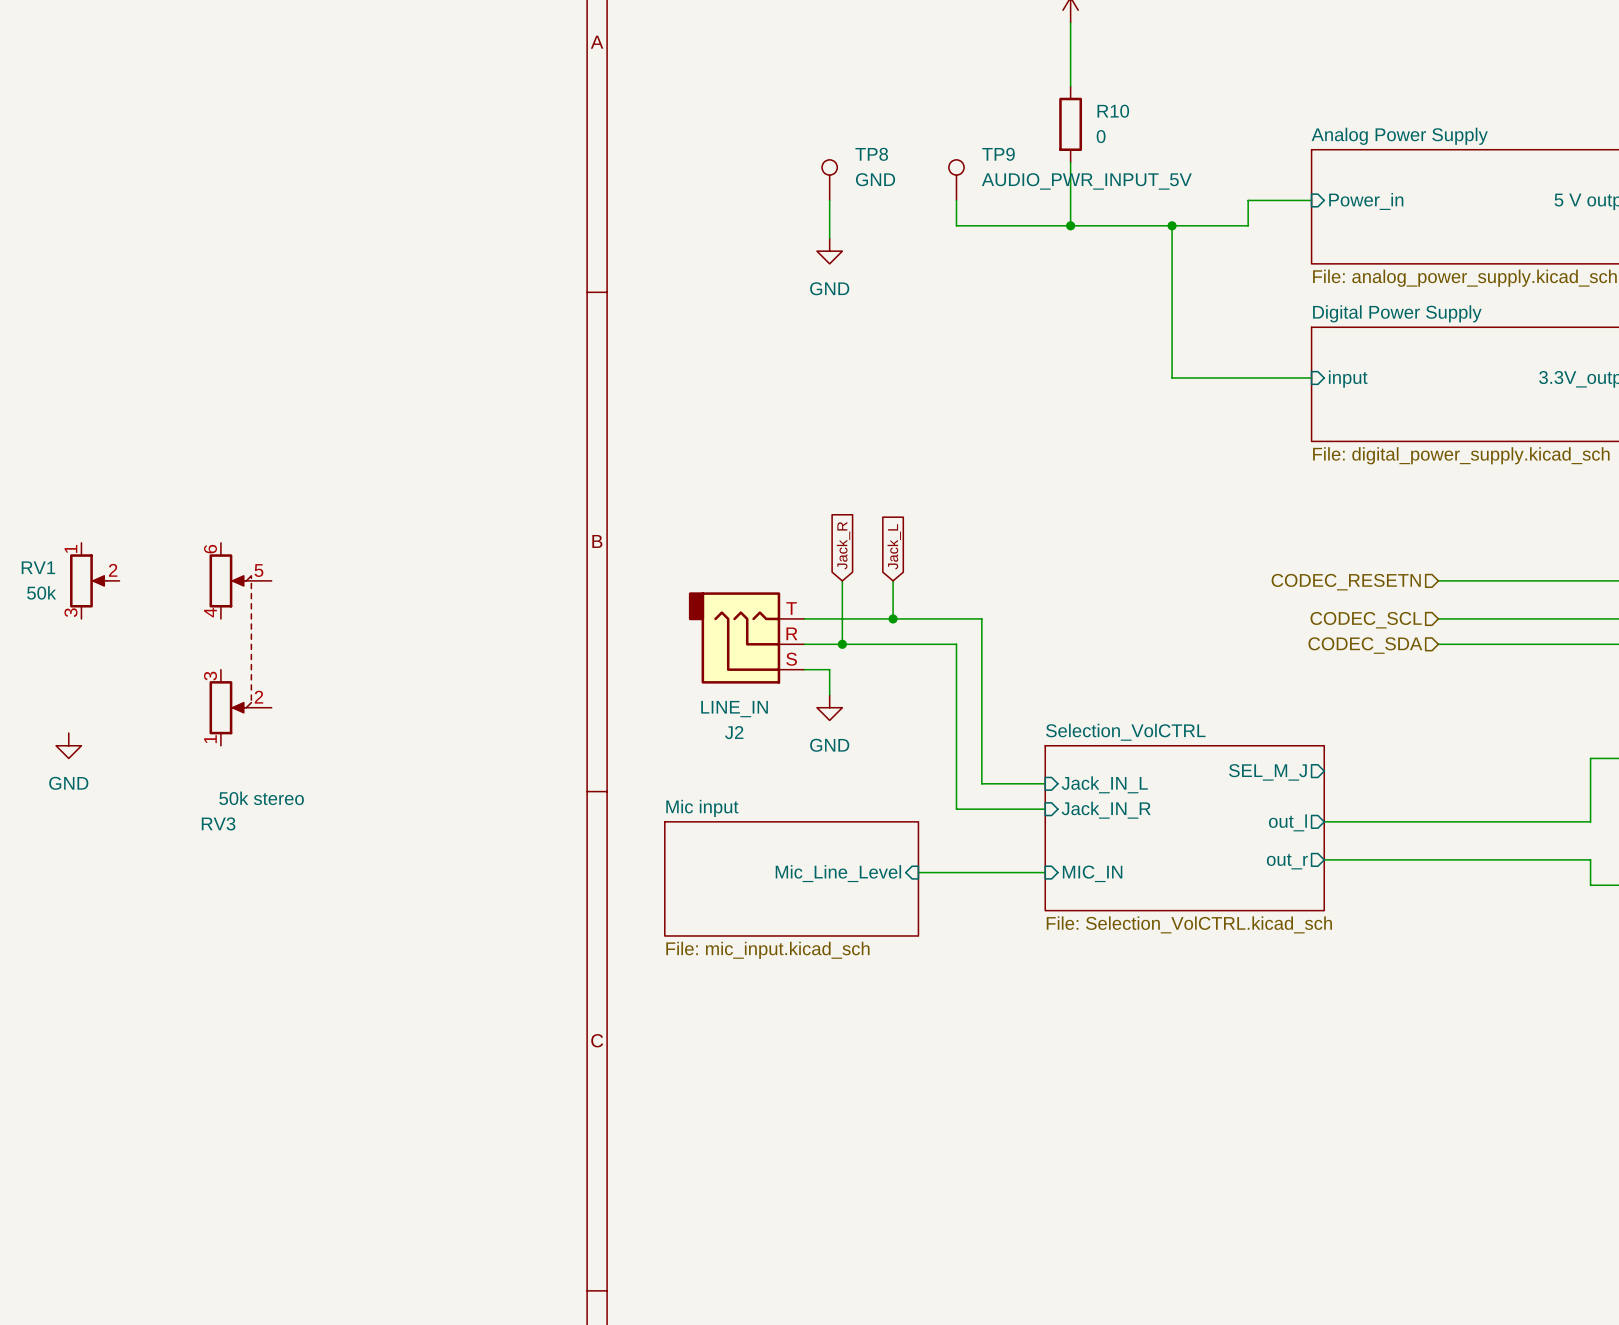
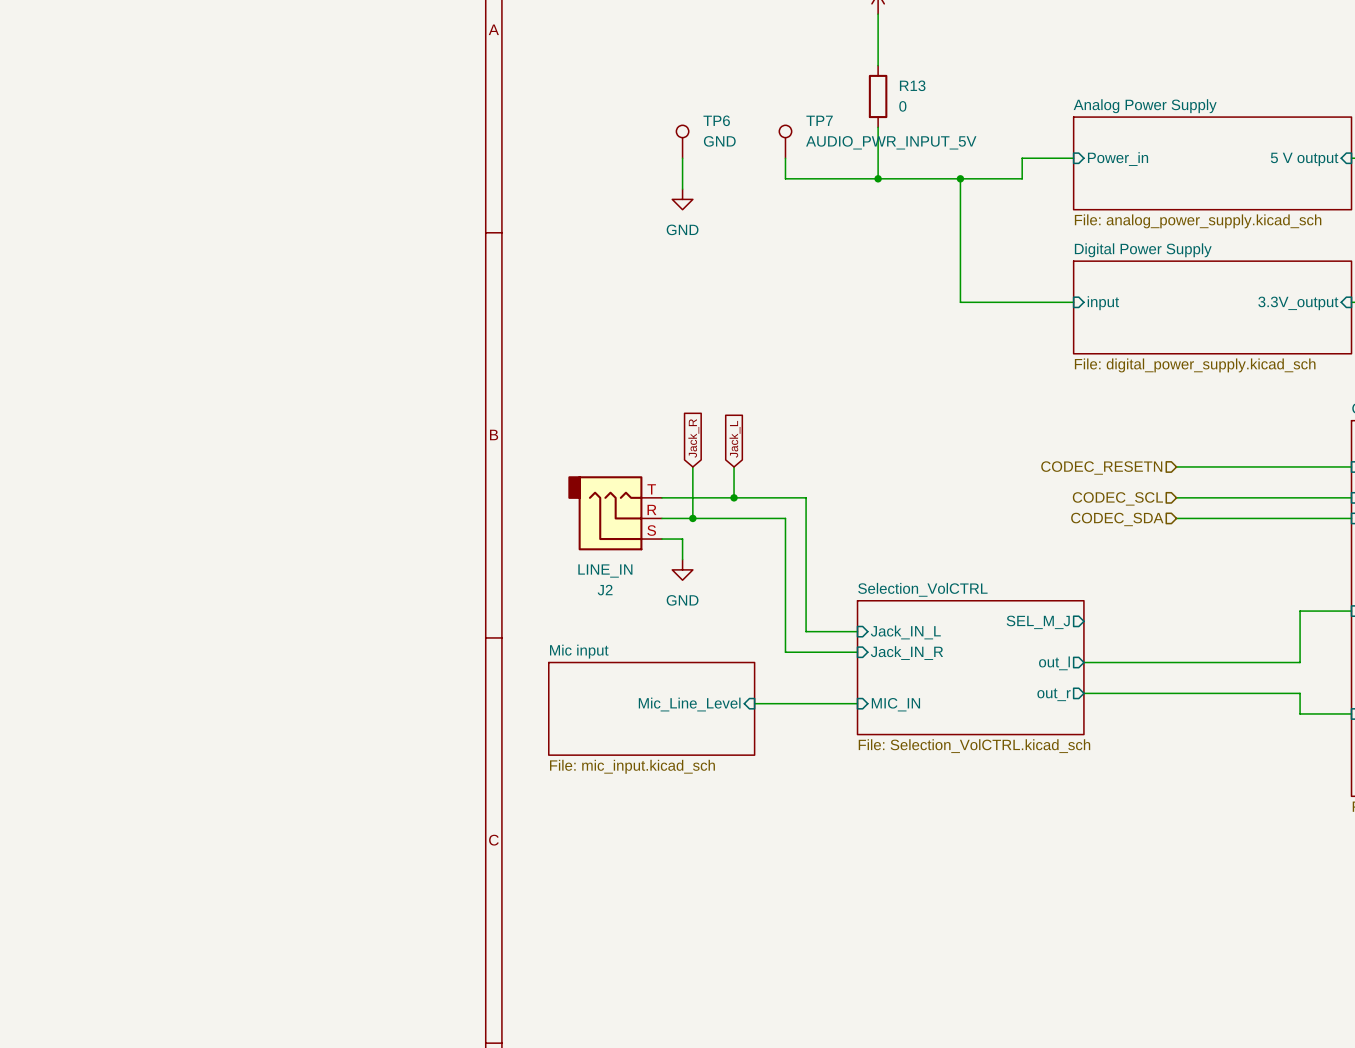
R10 name: R10 (1113, 111) -> R13 (912, 85)
TP8 name: TP8 (871, 154) -> TP6 (716, 120)
TP9 name: TP9 (998, 154) -> TP7 (819, 120)
RV1: 50k (94, 580) -> none
RV3: 50k stereo (240, 644) -> none
power symbol: GND (68, 745) -> none

